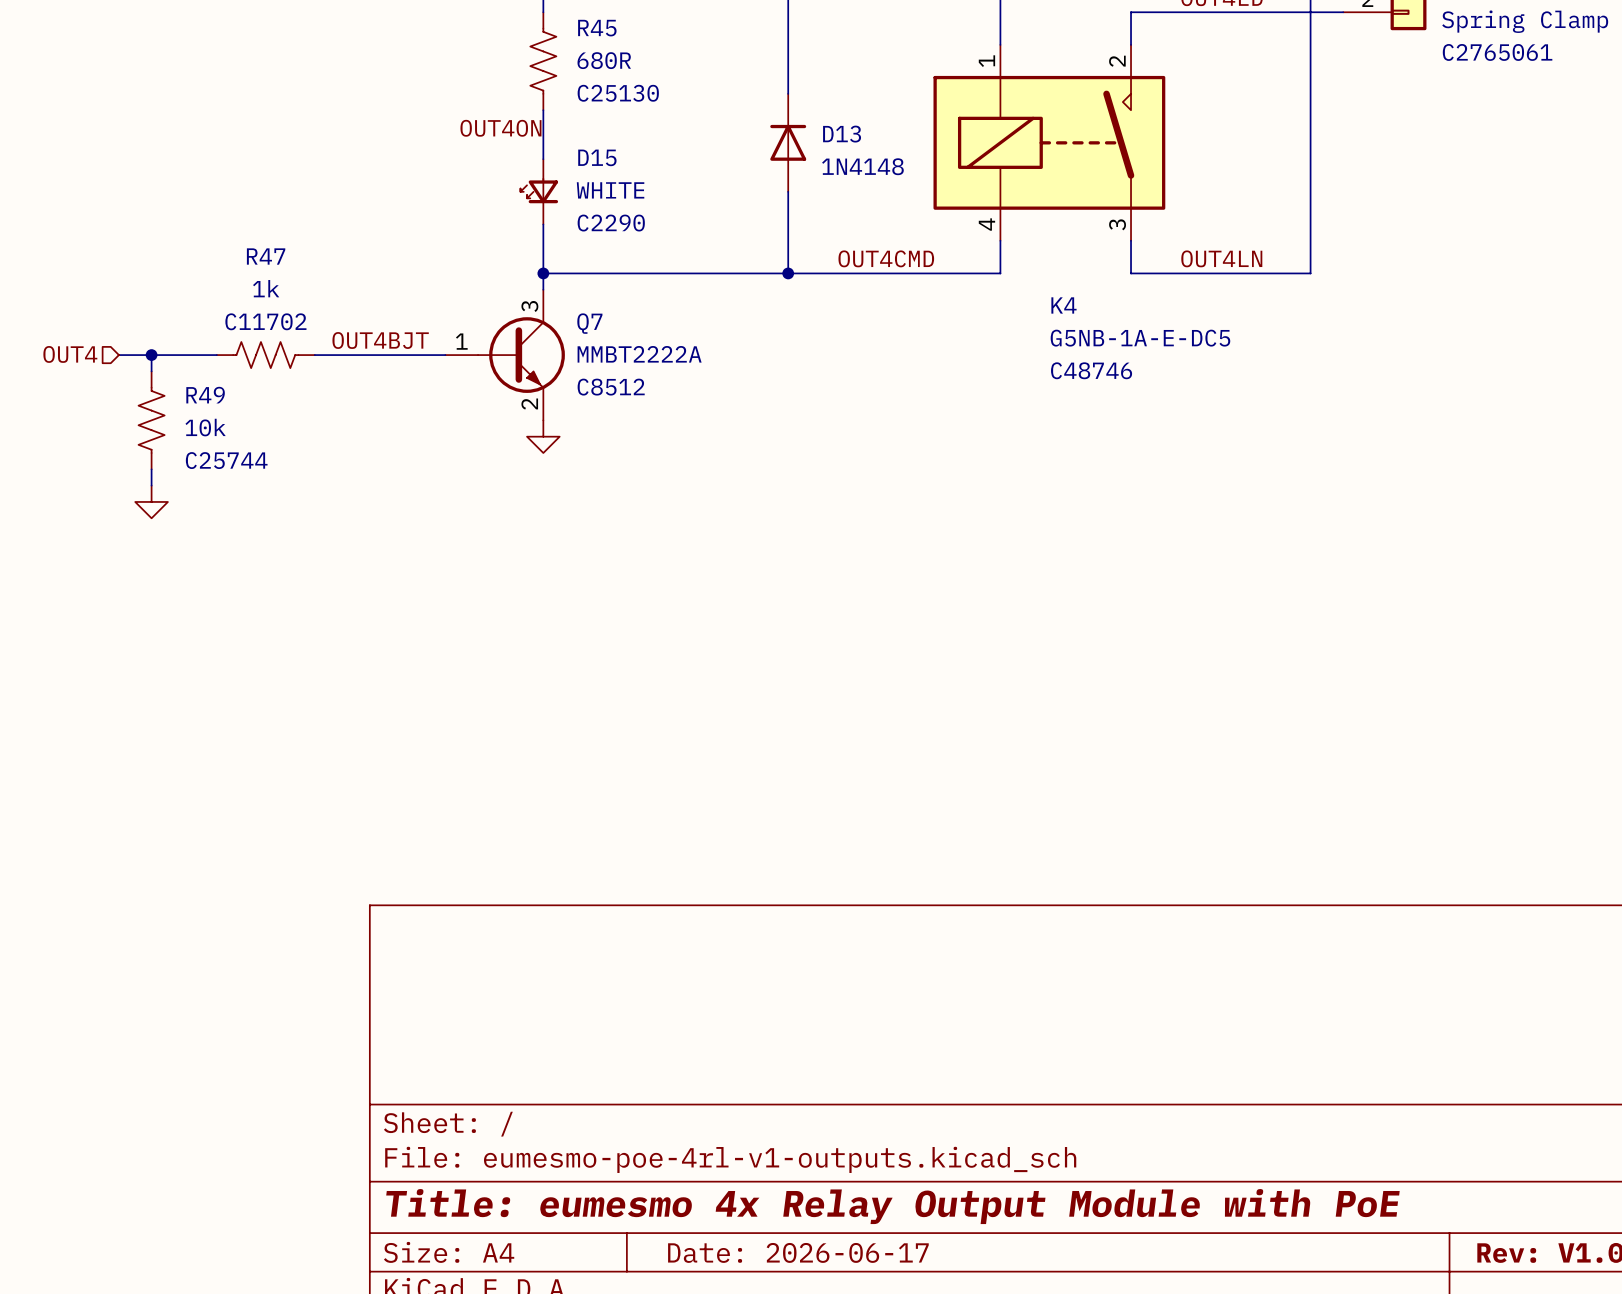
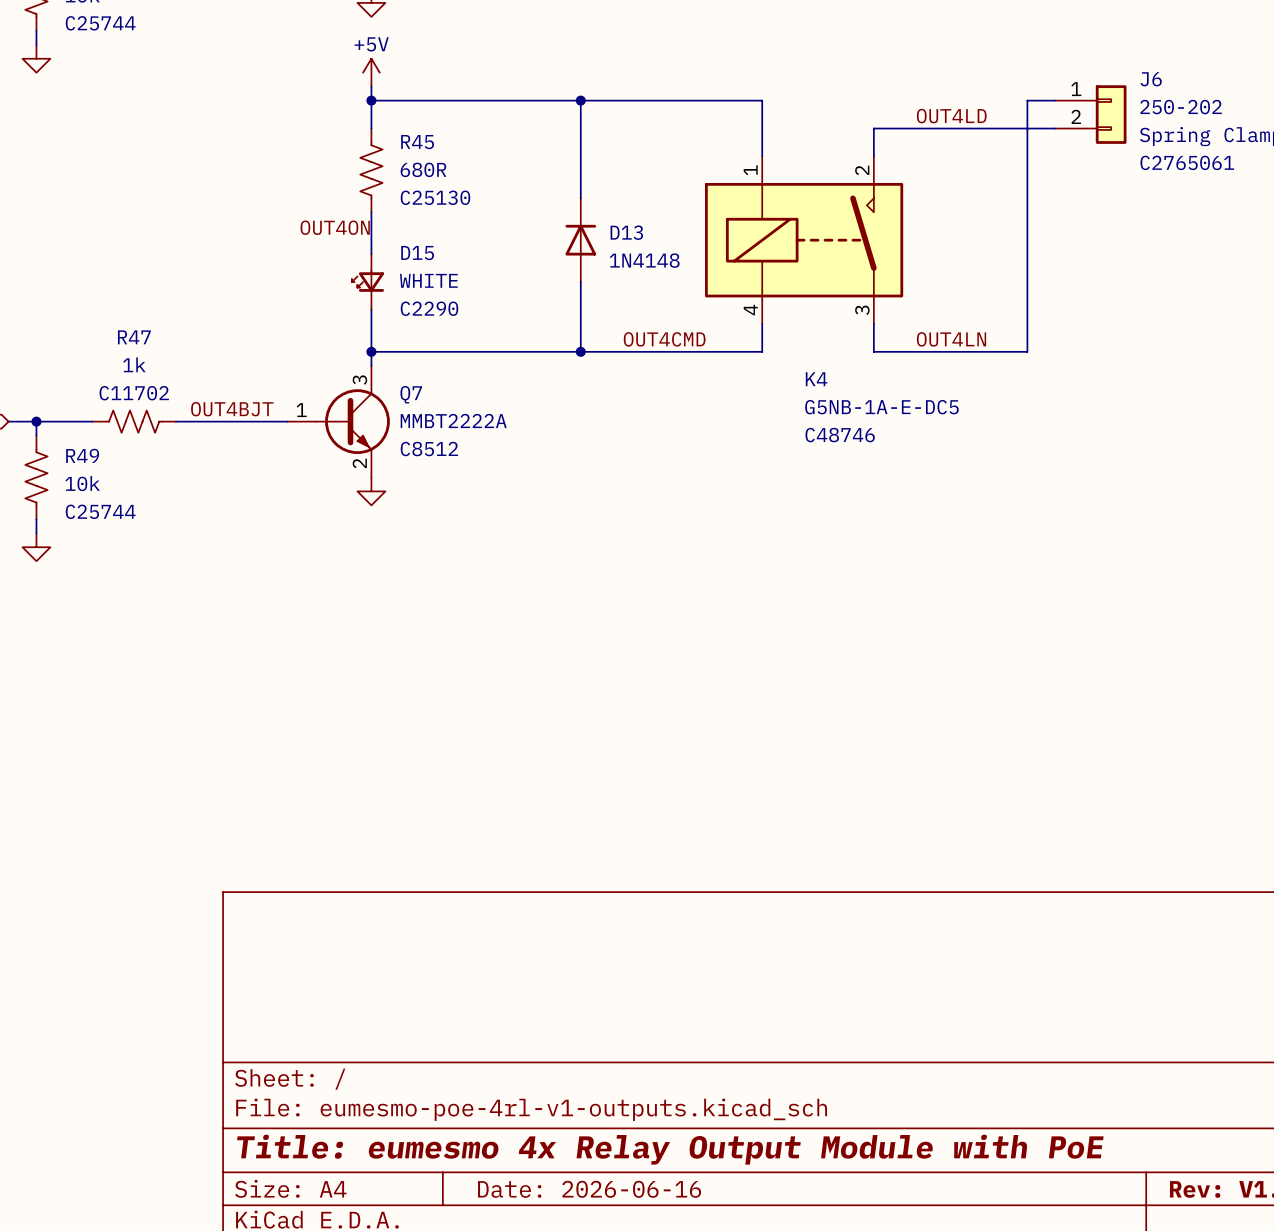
title block: Date: 2026-06-17 (798, 1252) -> Date: 2026-06-16 (589, 1189)

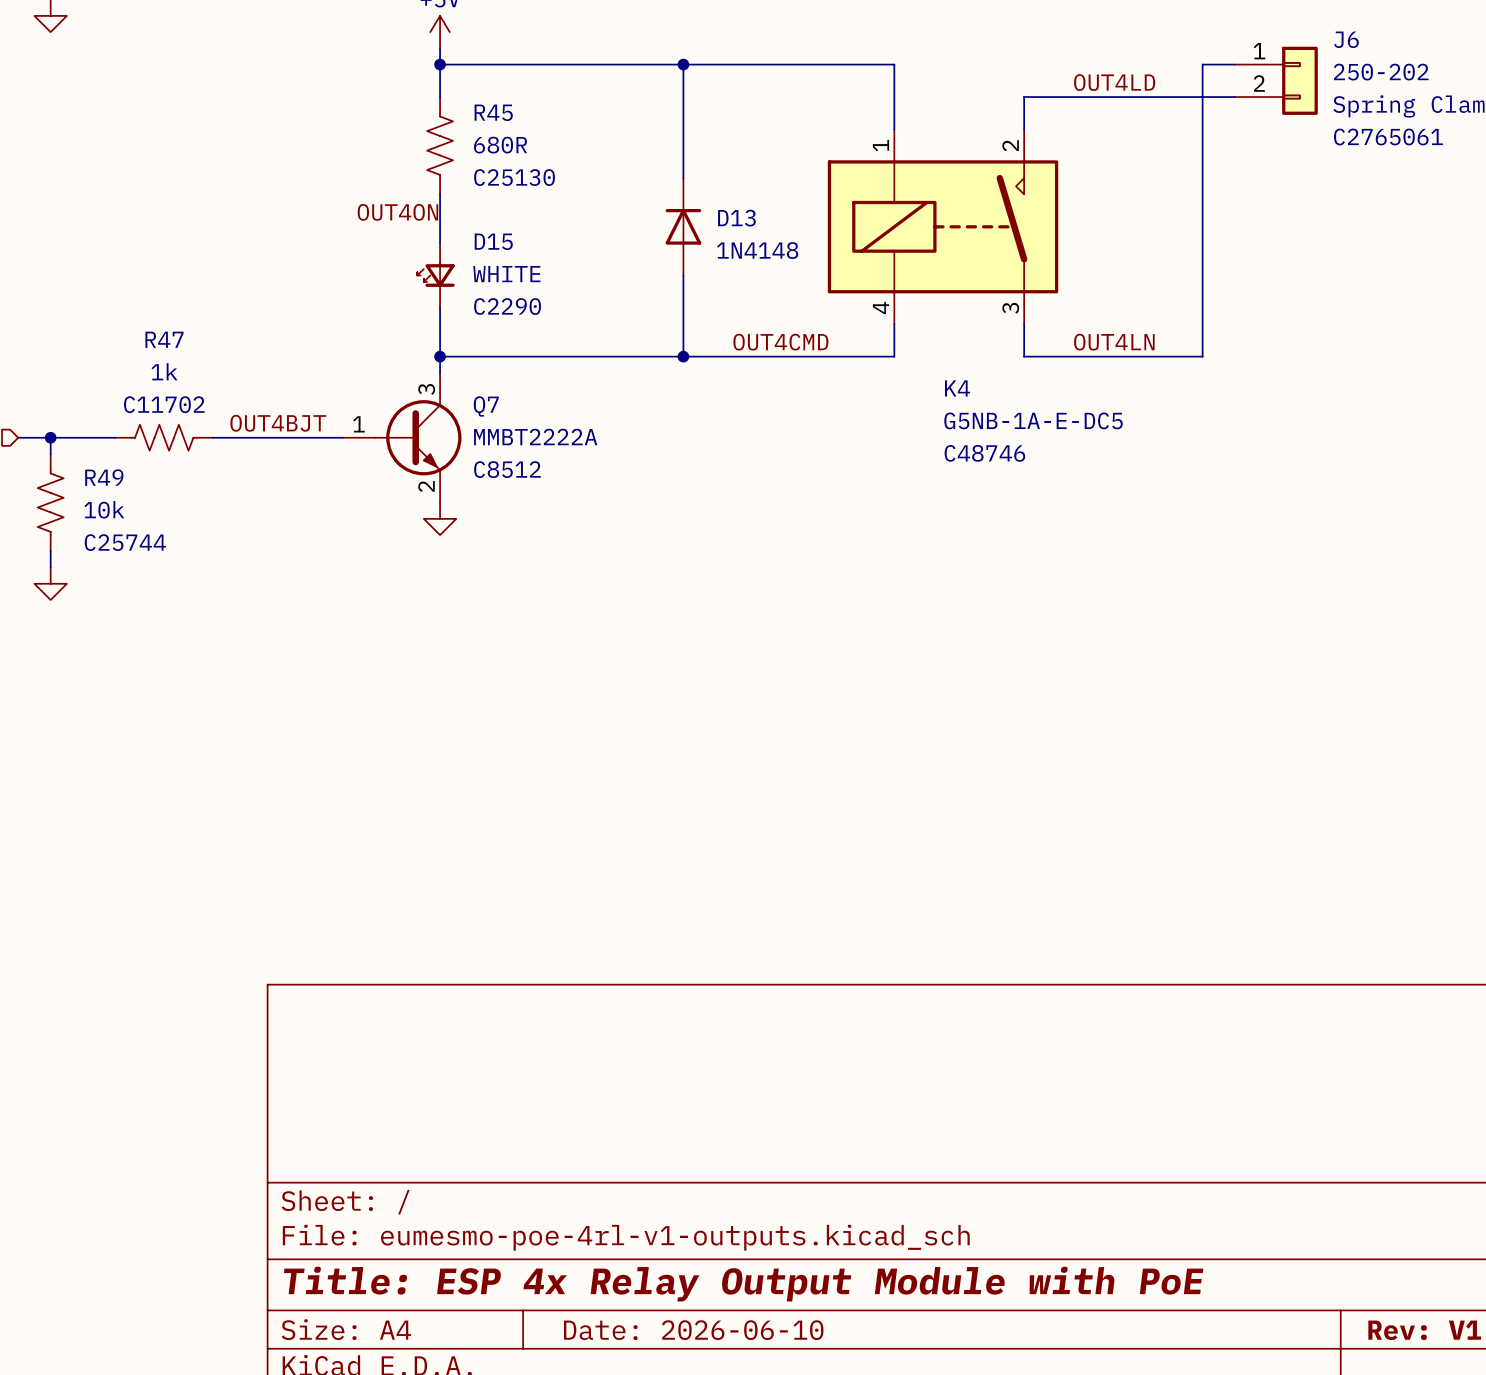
title block: Title: eumesmo 4x Relay Output Module with PoE (670, 1149) -> Title: ESP 4x Relay Output Module with PoE (743, 1284)
title block: Date: 2026-06-16 (589, 1189) -> Date: 2026-06-10 (693, 1330)

